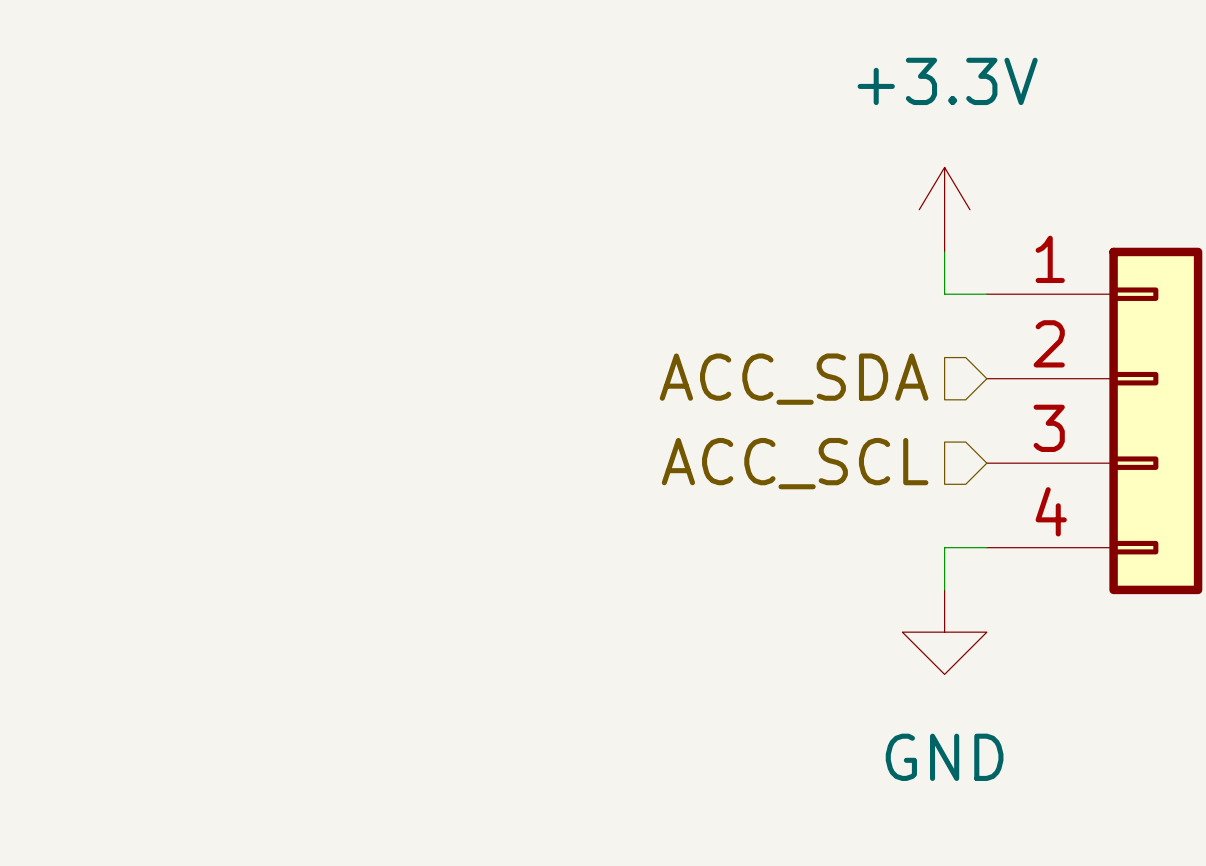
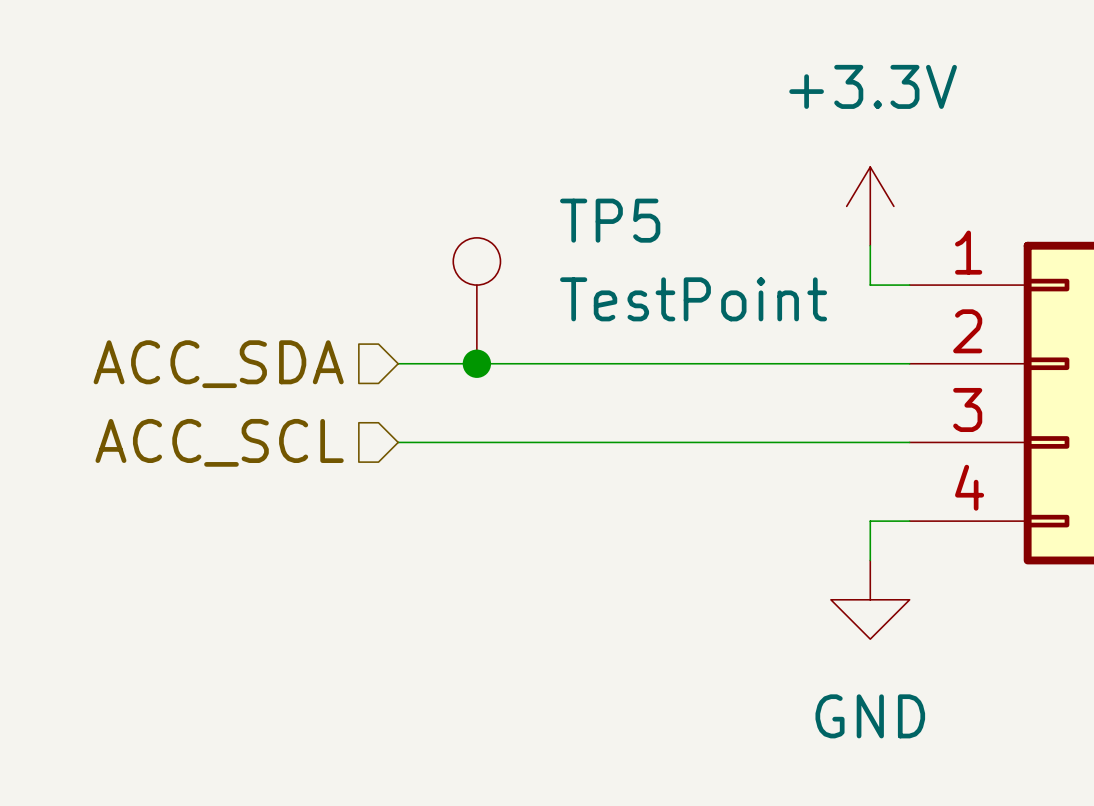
TP5: none -> TestPoint (476, 300)
wire: none -> (398, 363) (909, 363)
junction: none -> (476, 363)
hierarchical label position: ACC_SDA (794, 379) -> ACC_SDA (218, 364)
wire: none -> (398, 442) (909, 442)
hierarchical label position: ACC_SCL (795, 463) -> ACC_SCL (219, 442)

